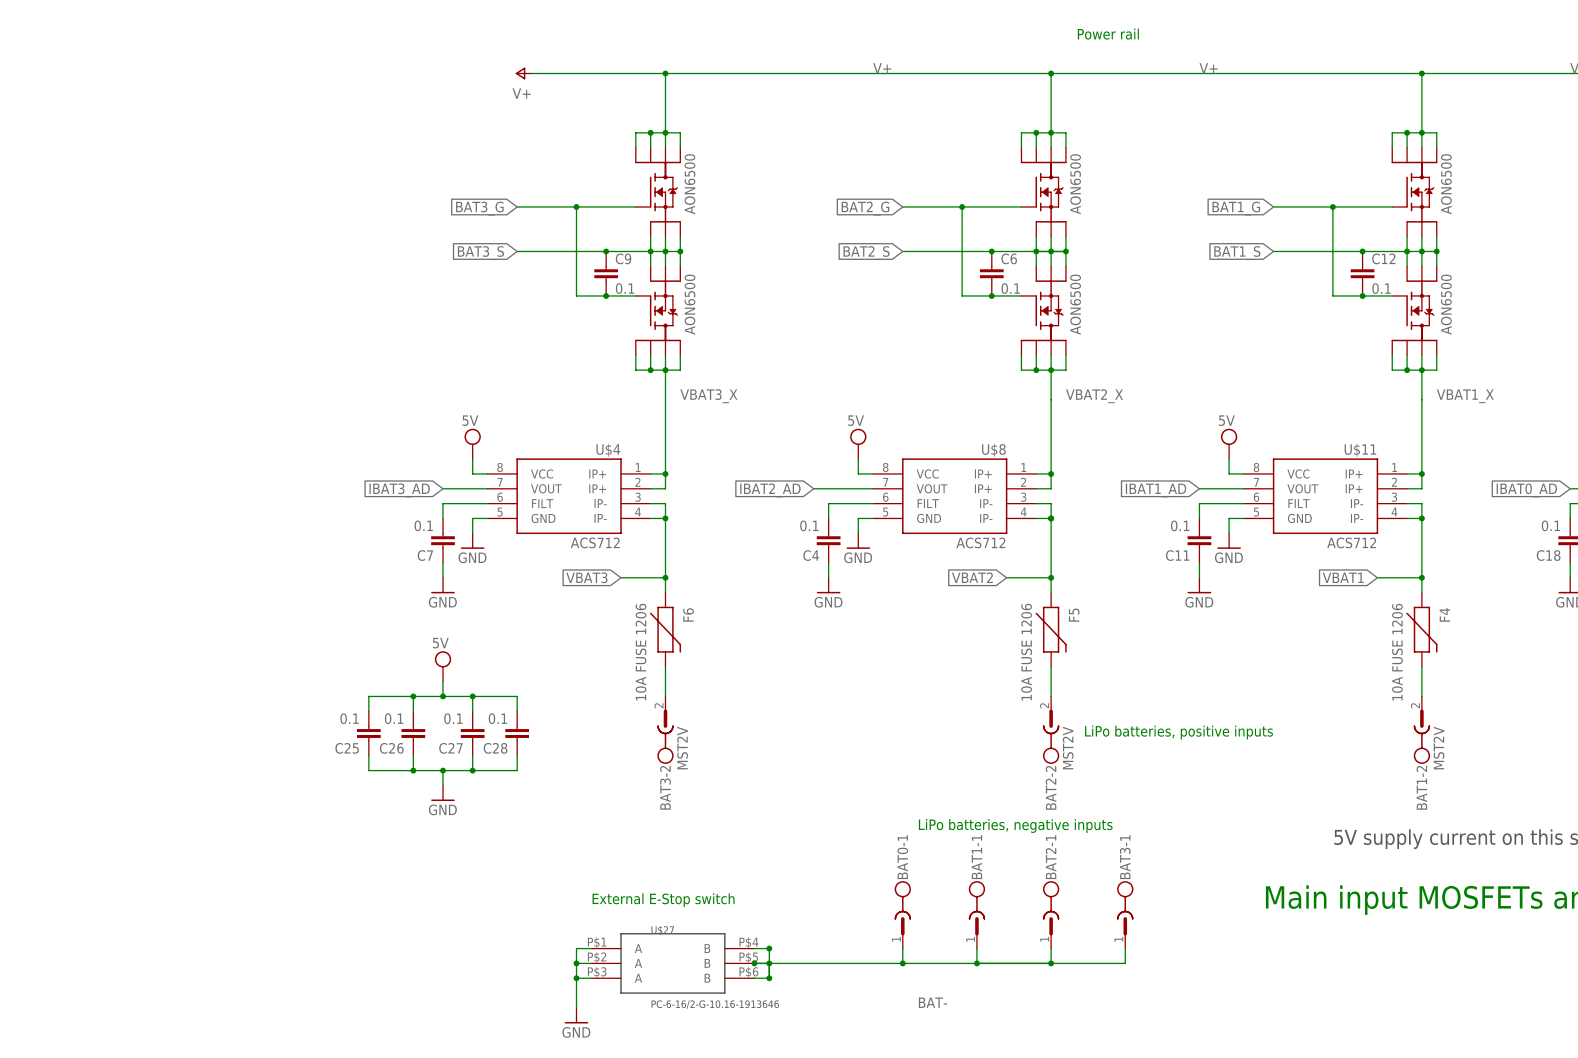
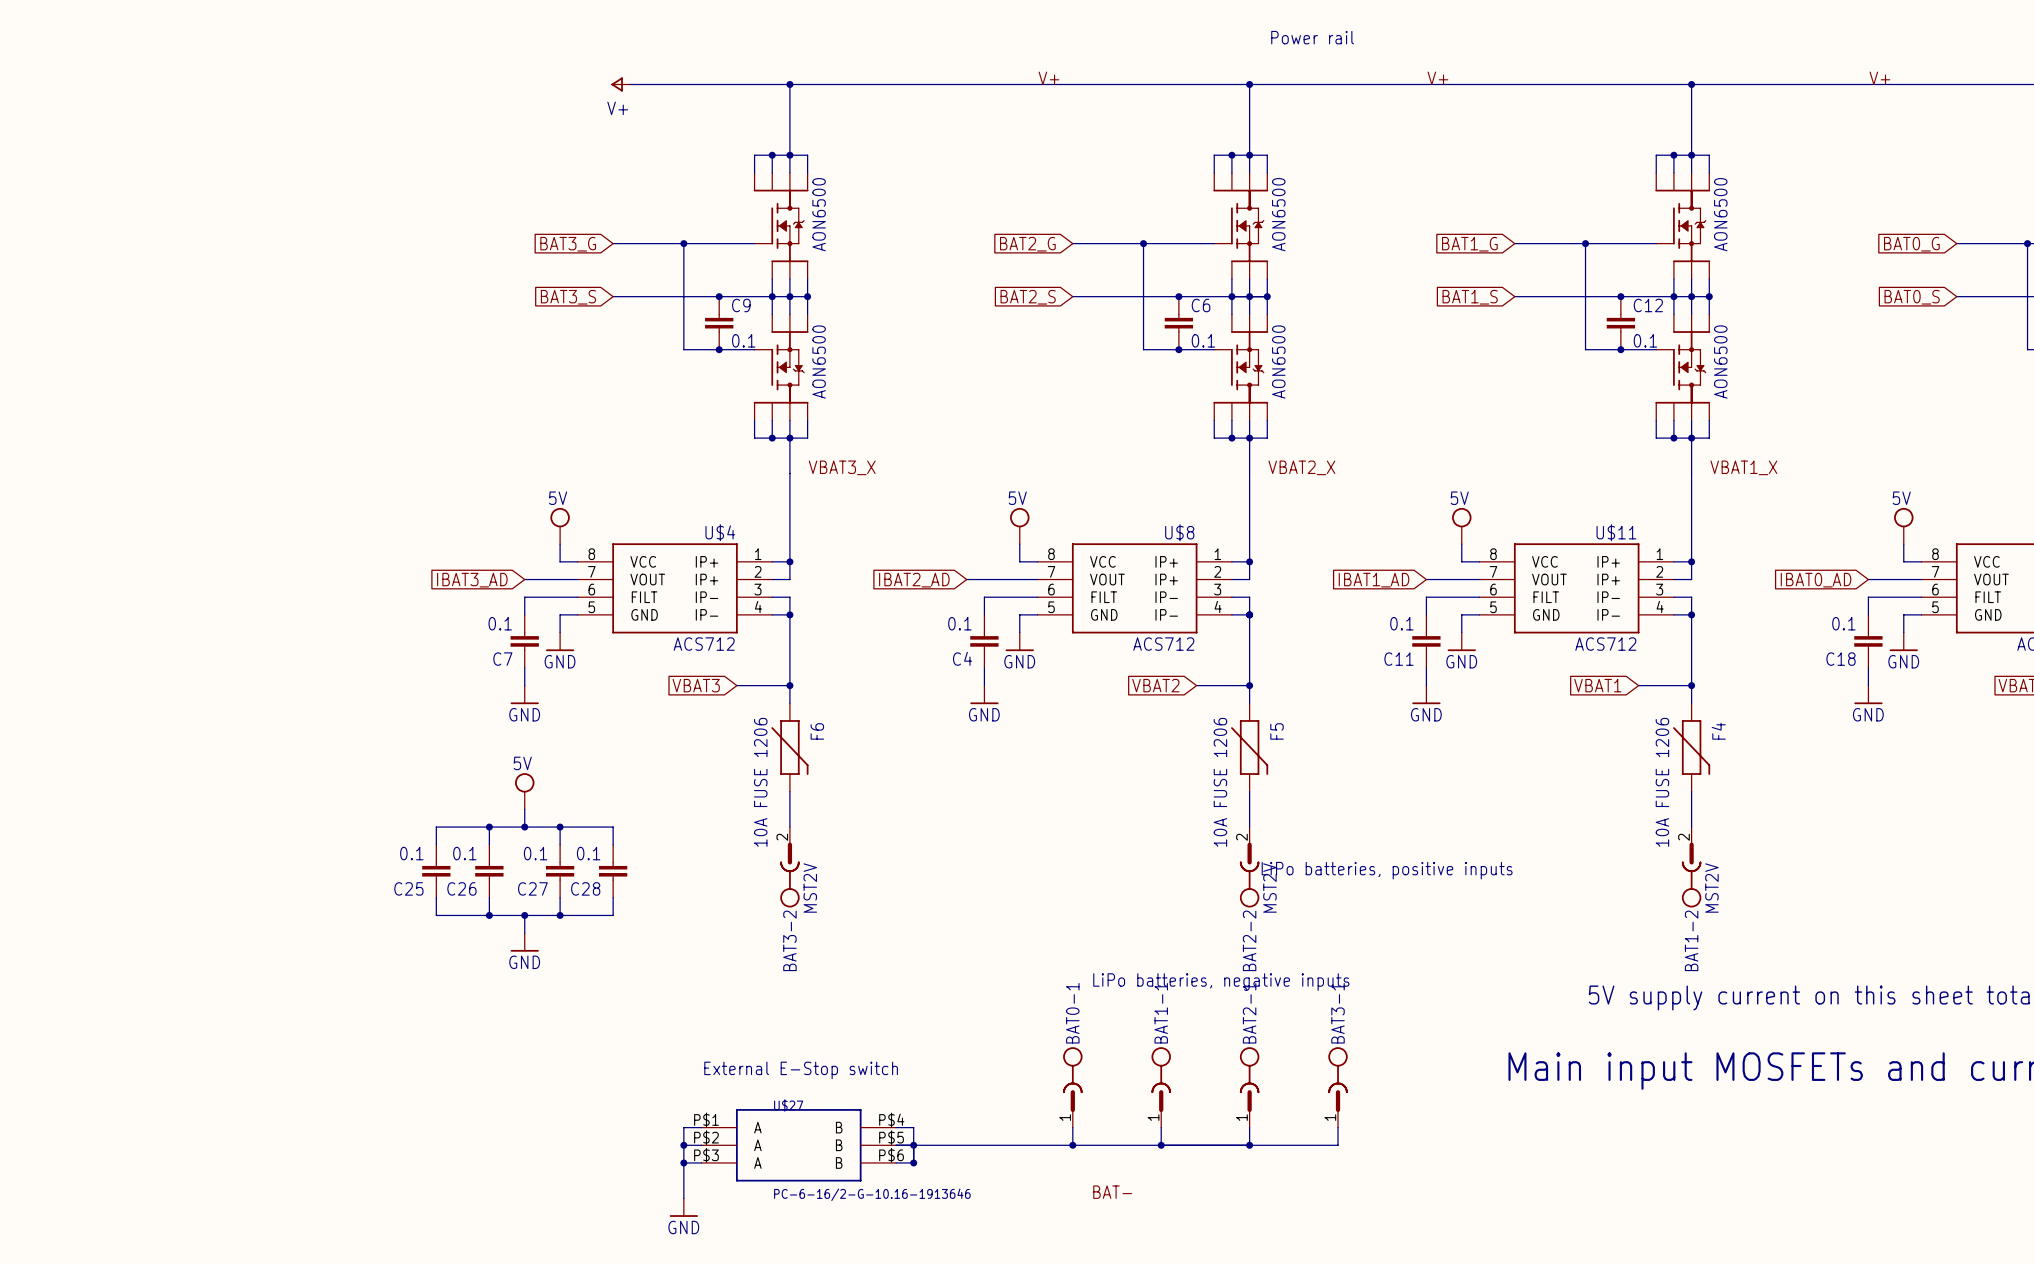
junction: (769, 948) -> none
junction: (754, 963) -> none

